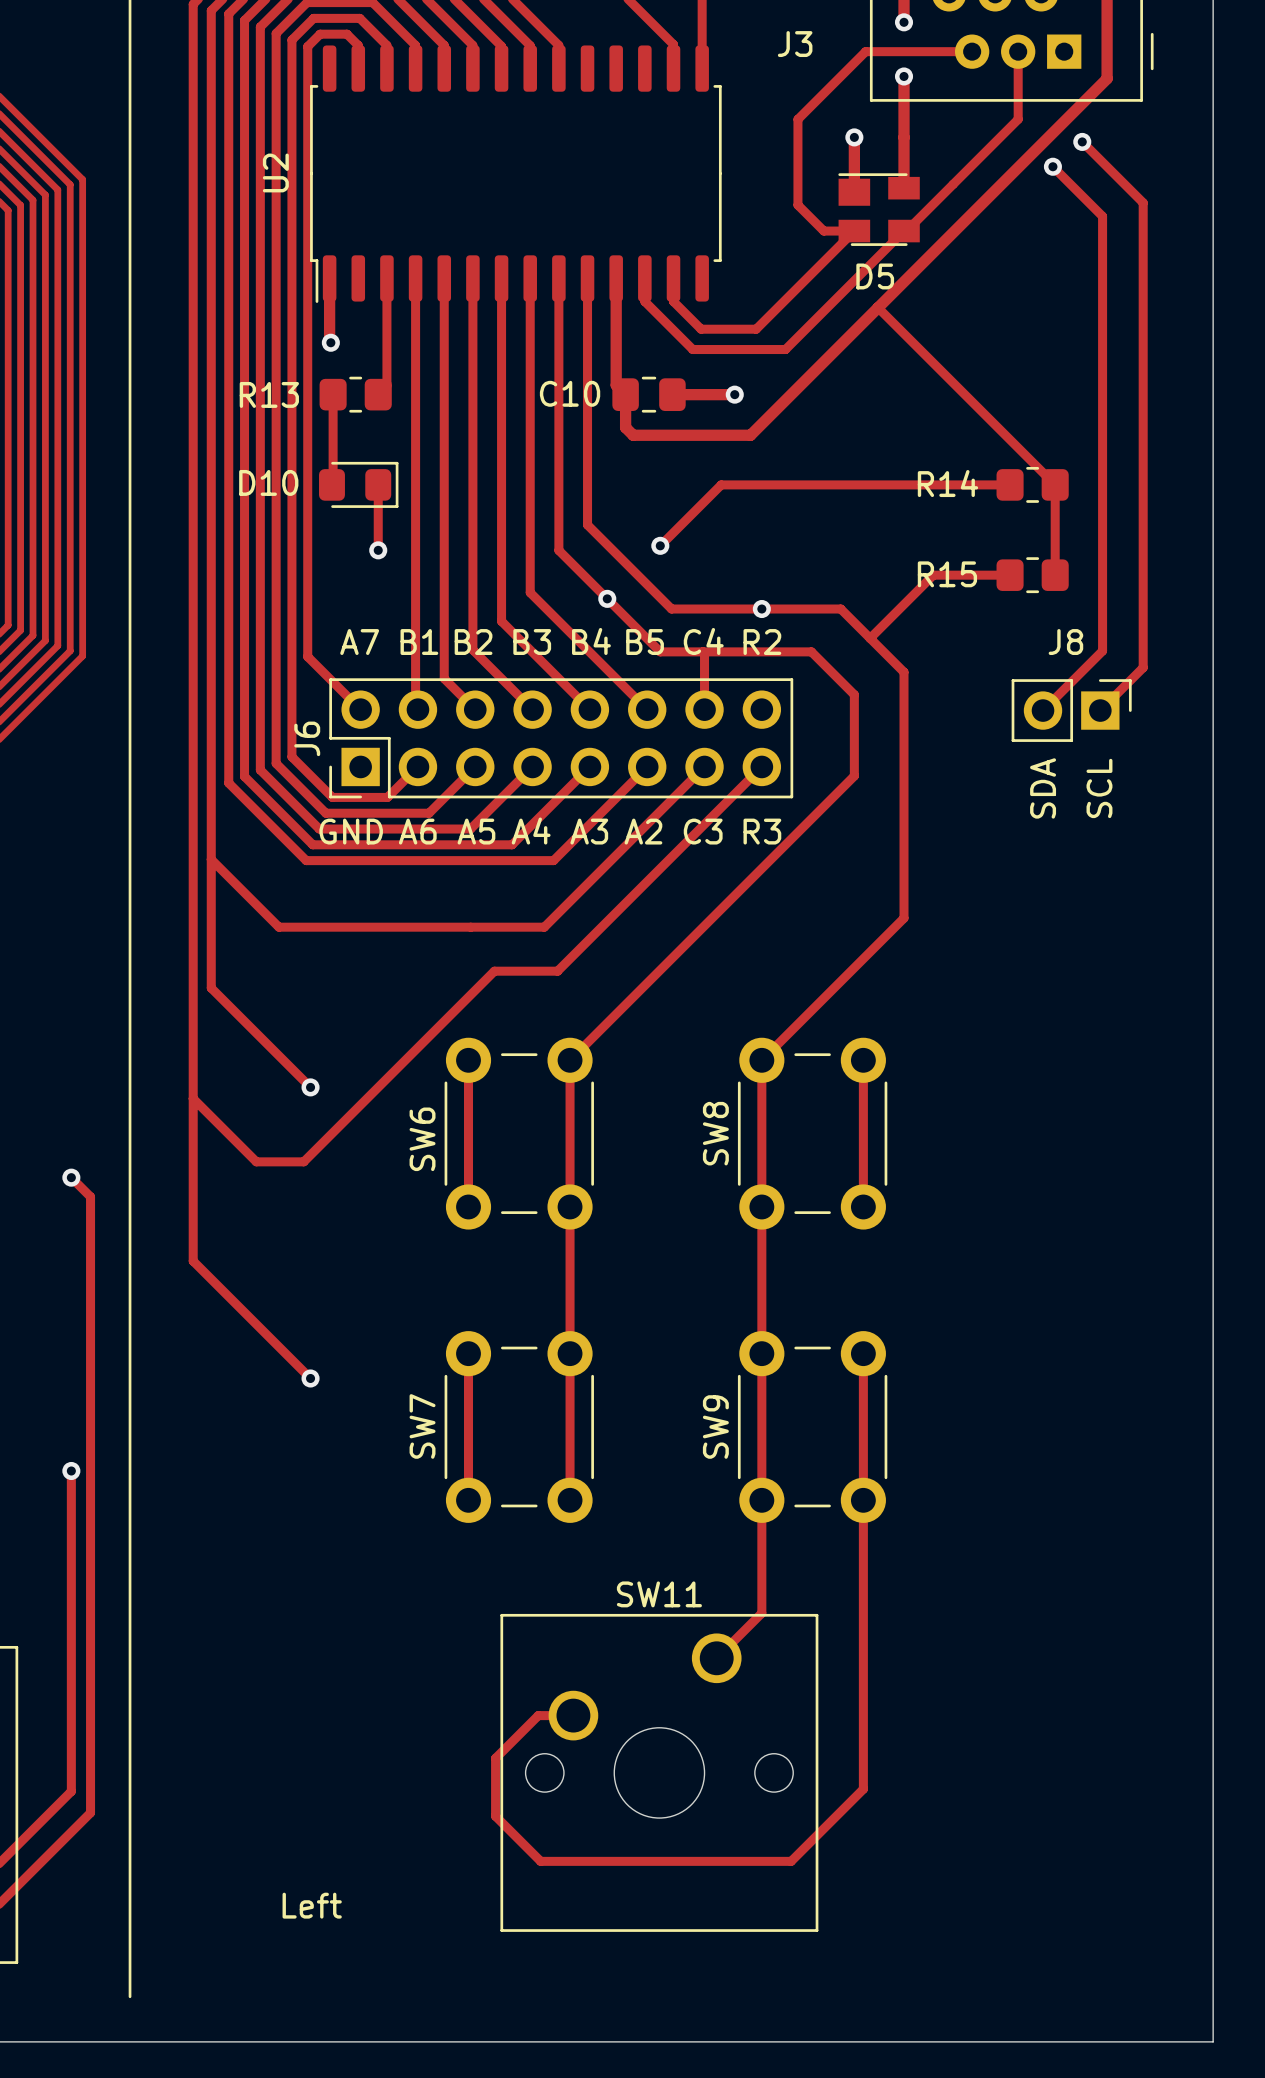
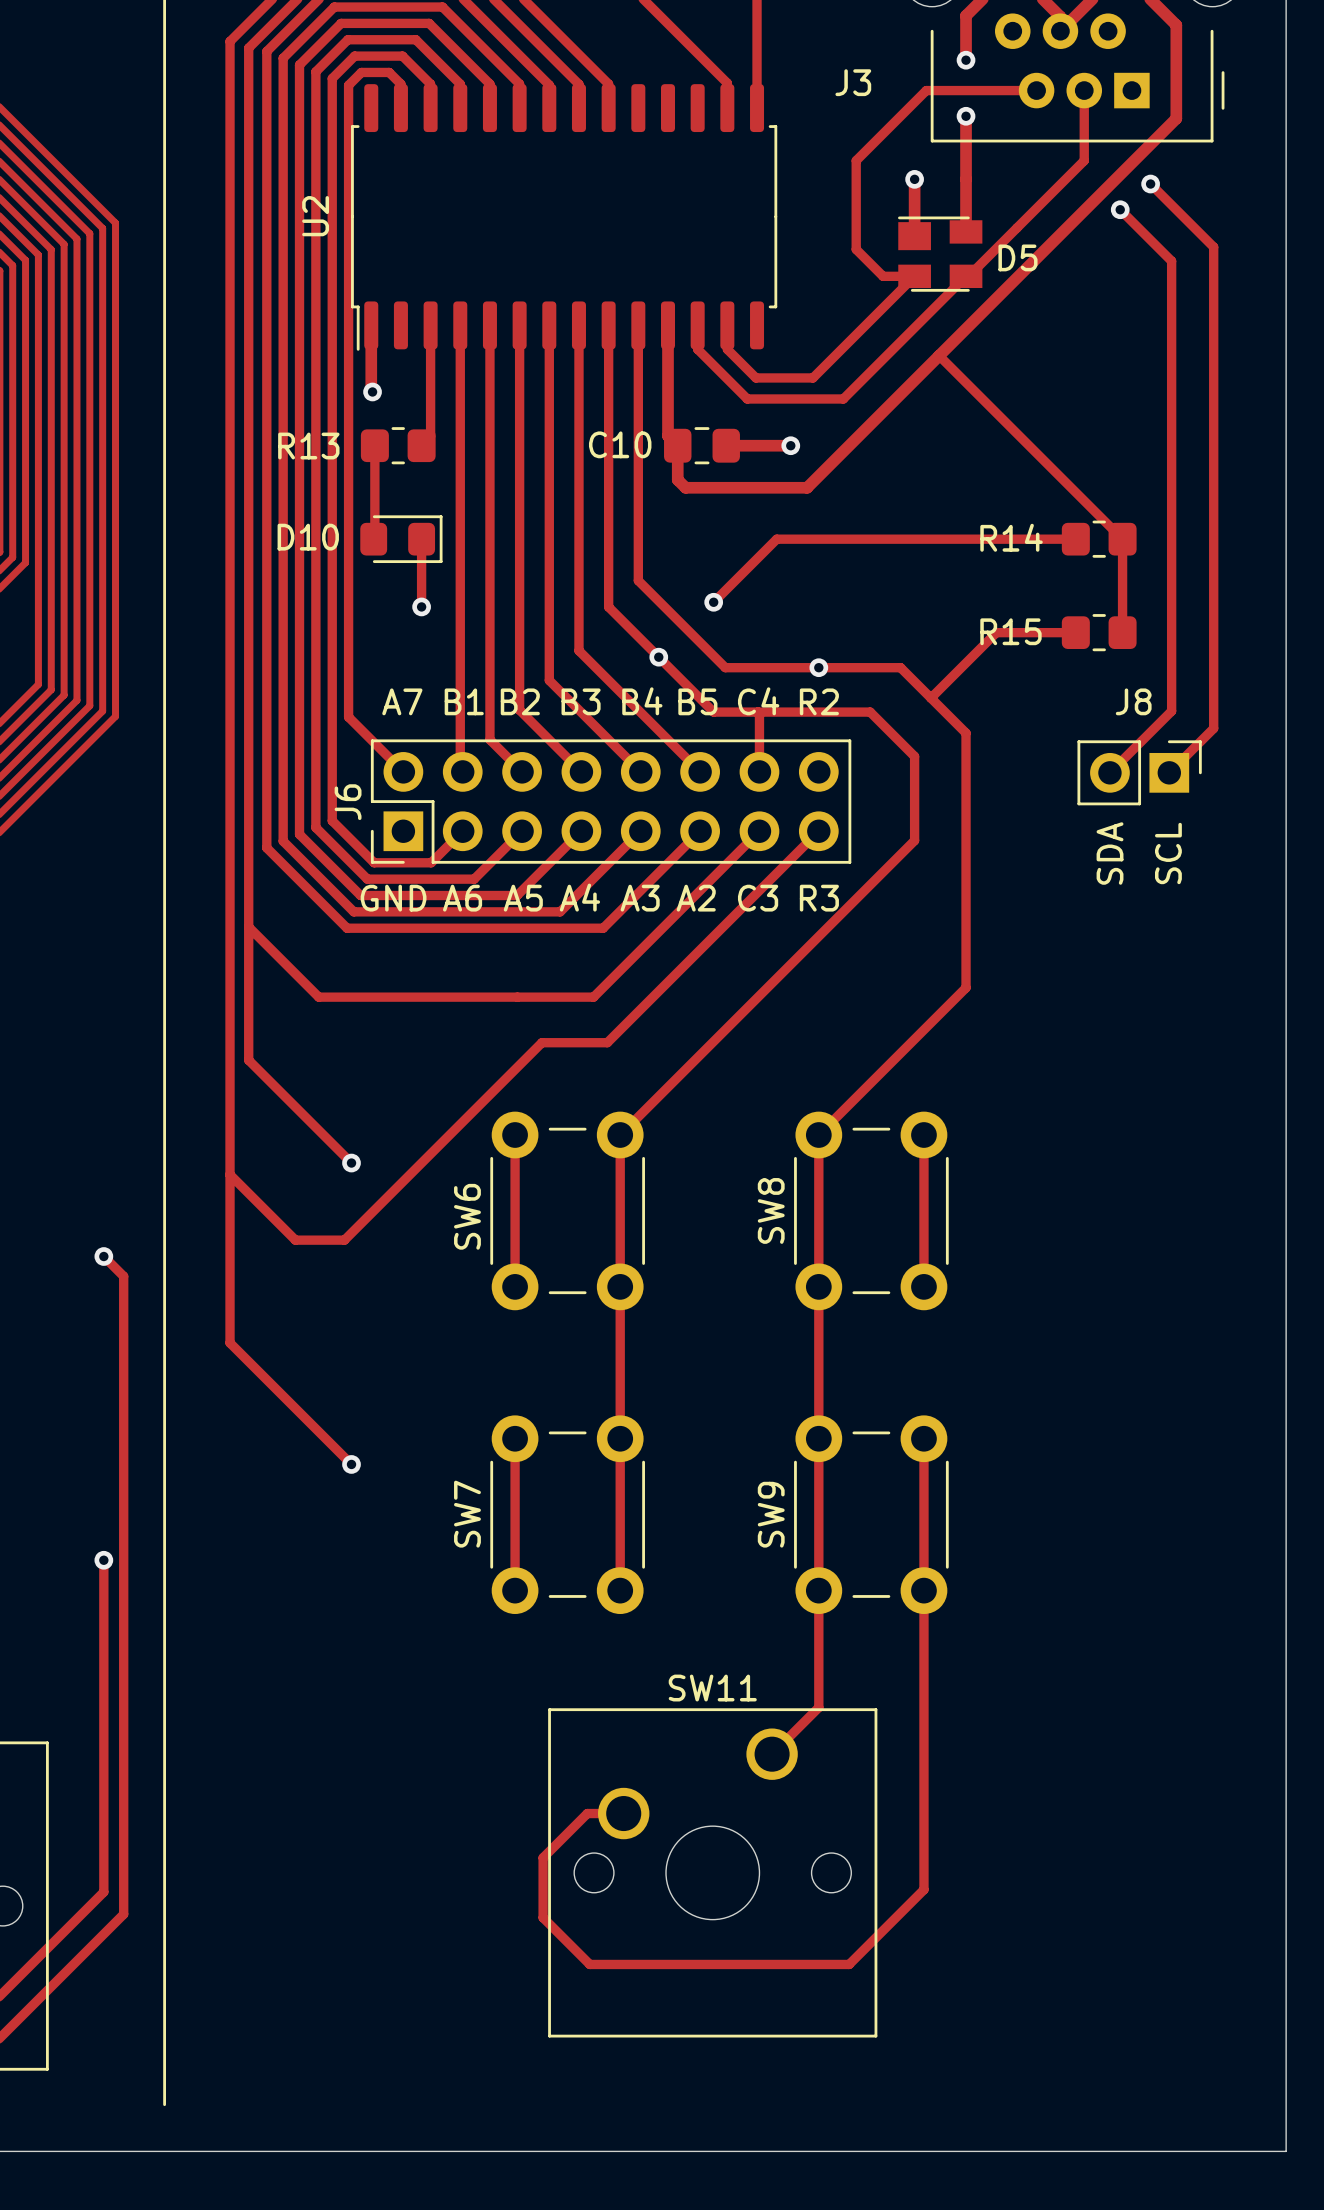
D5 name position: D5 (875, 276) -> D5 (1017, 257)
text: Left (312, 1905) -> none

